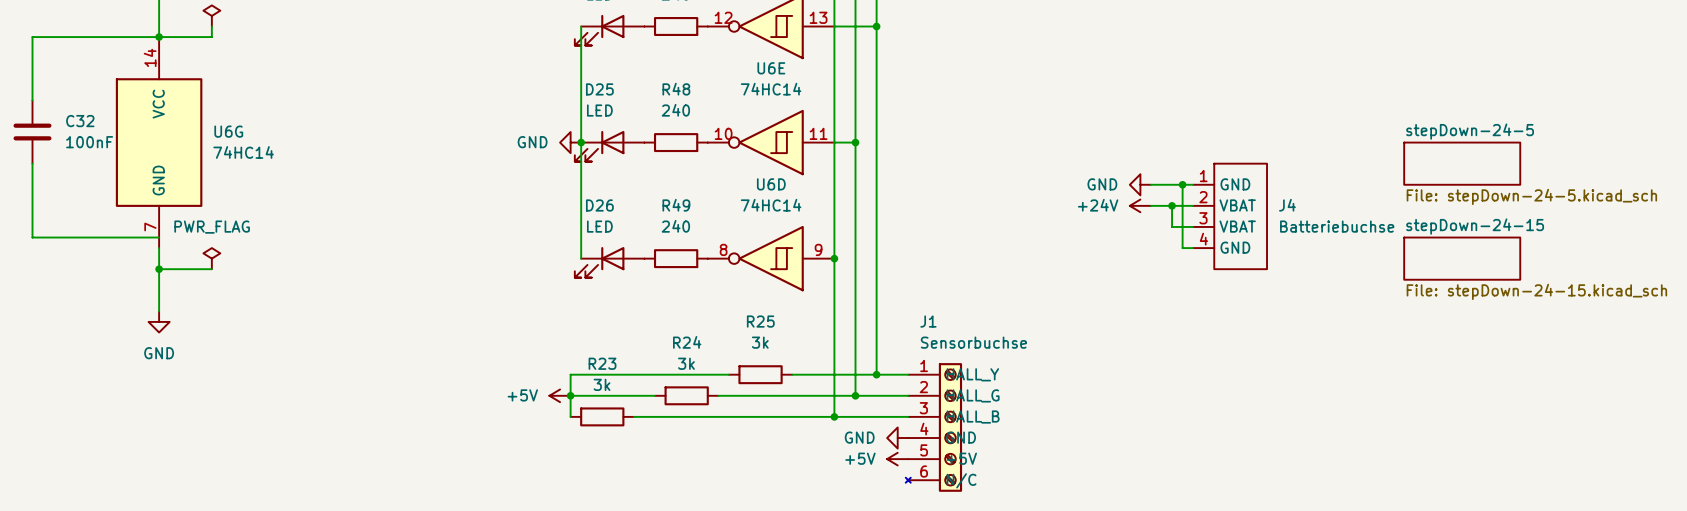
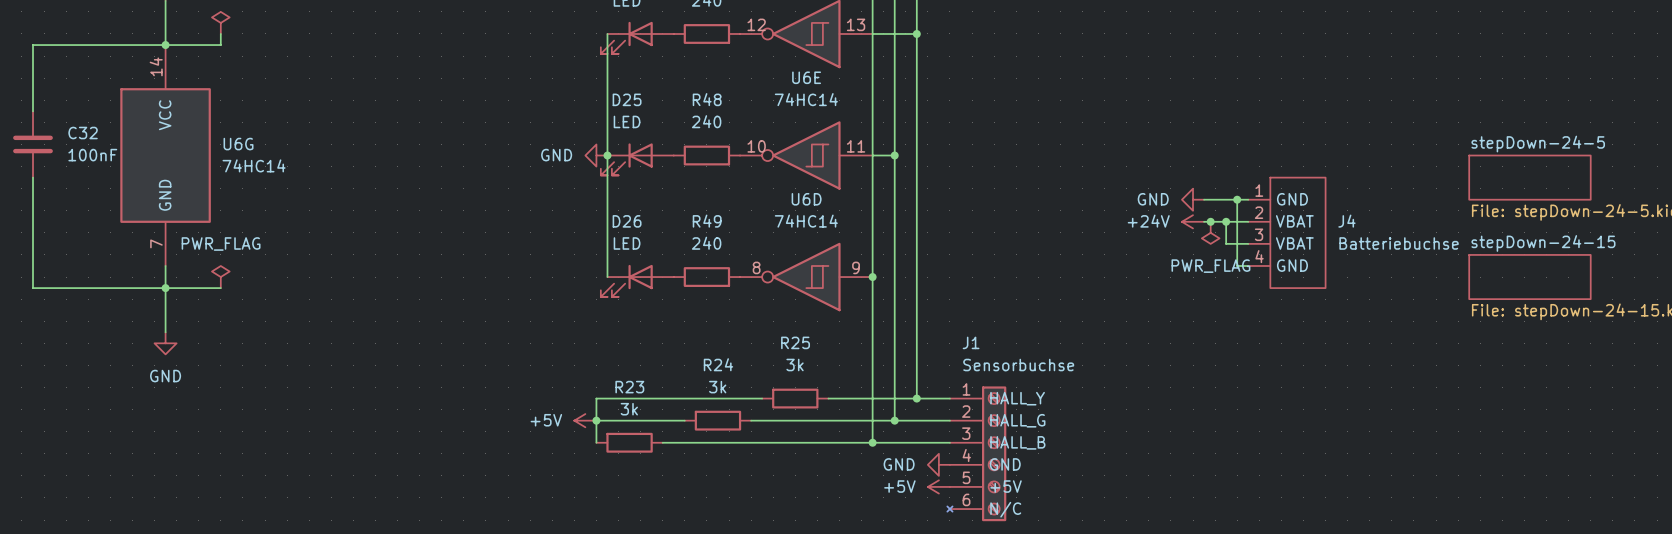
junction: none -> (1210, 221)
power symbol: none -> PWR_FLAG (1210, 232)
wire: (32, 237) (159, 237) -> (33, 254) (33, 288) (165, 288)

